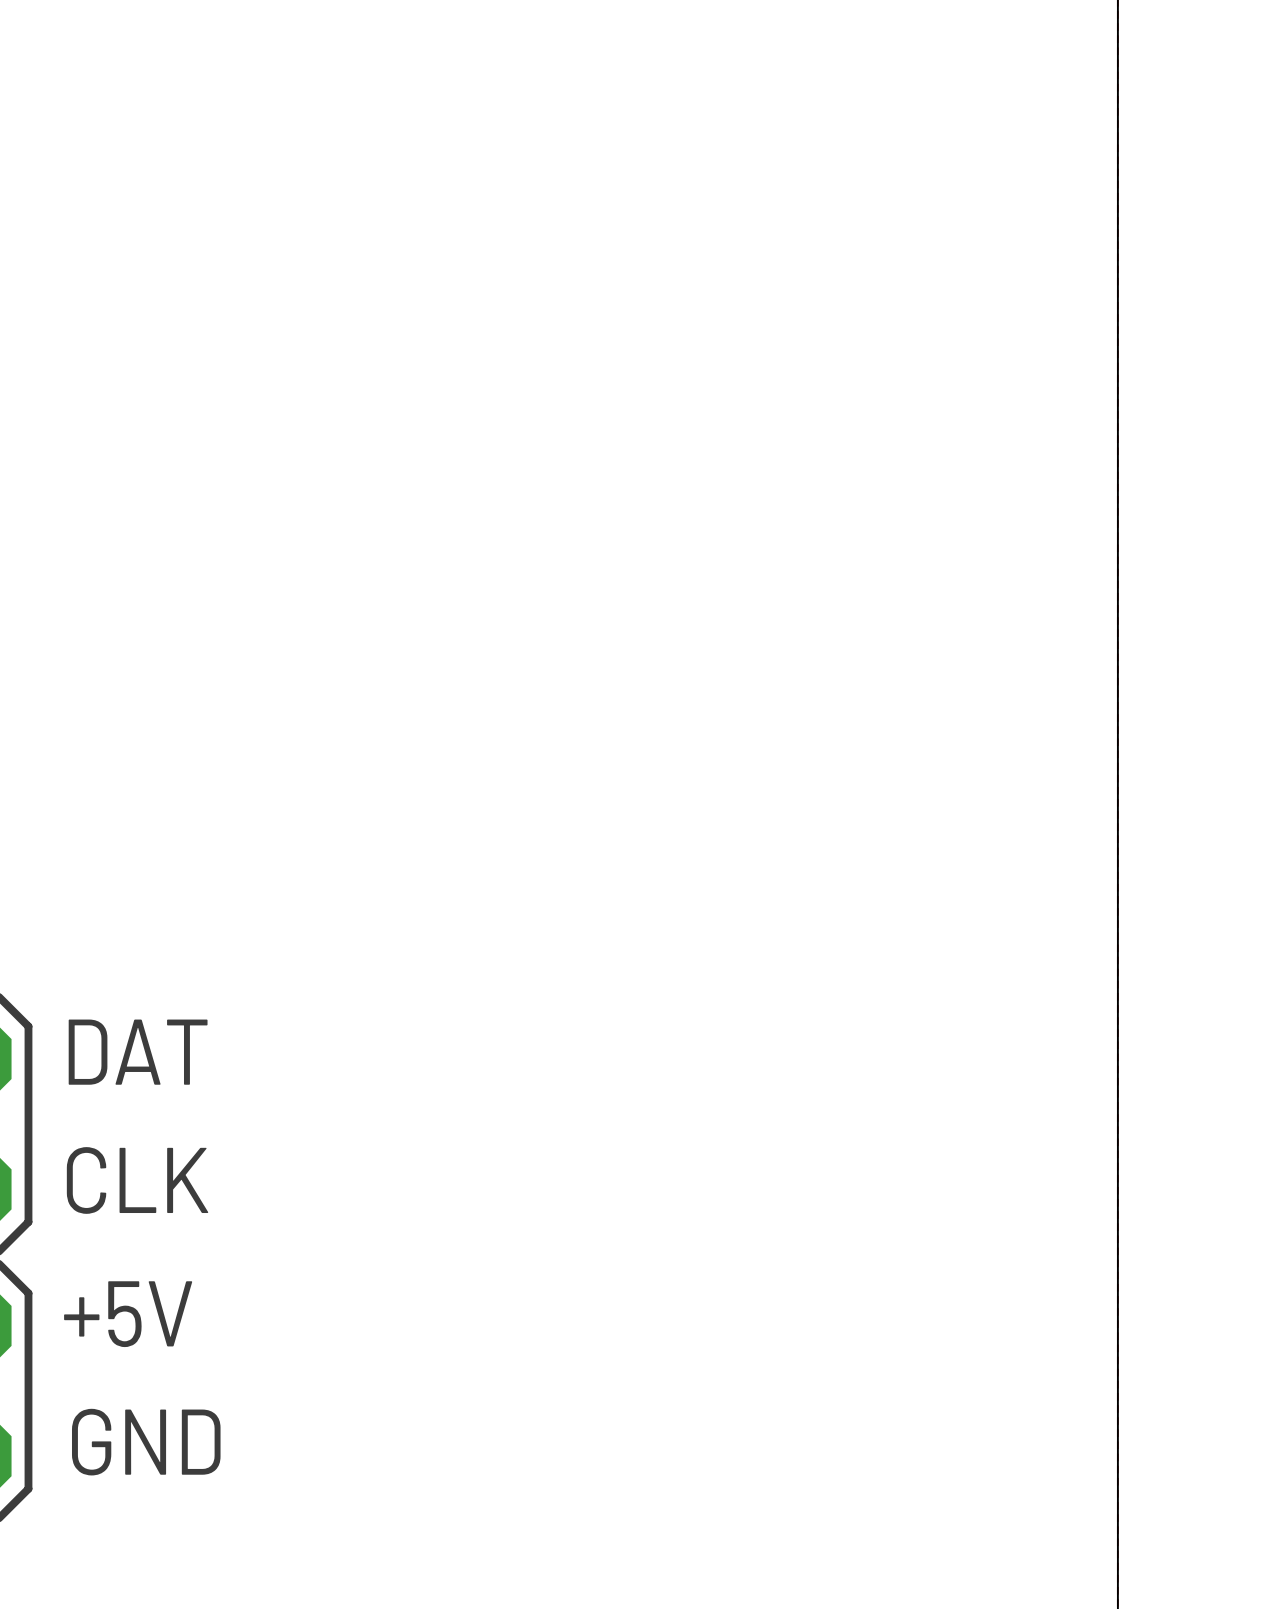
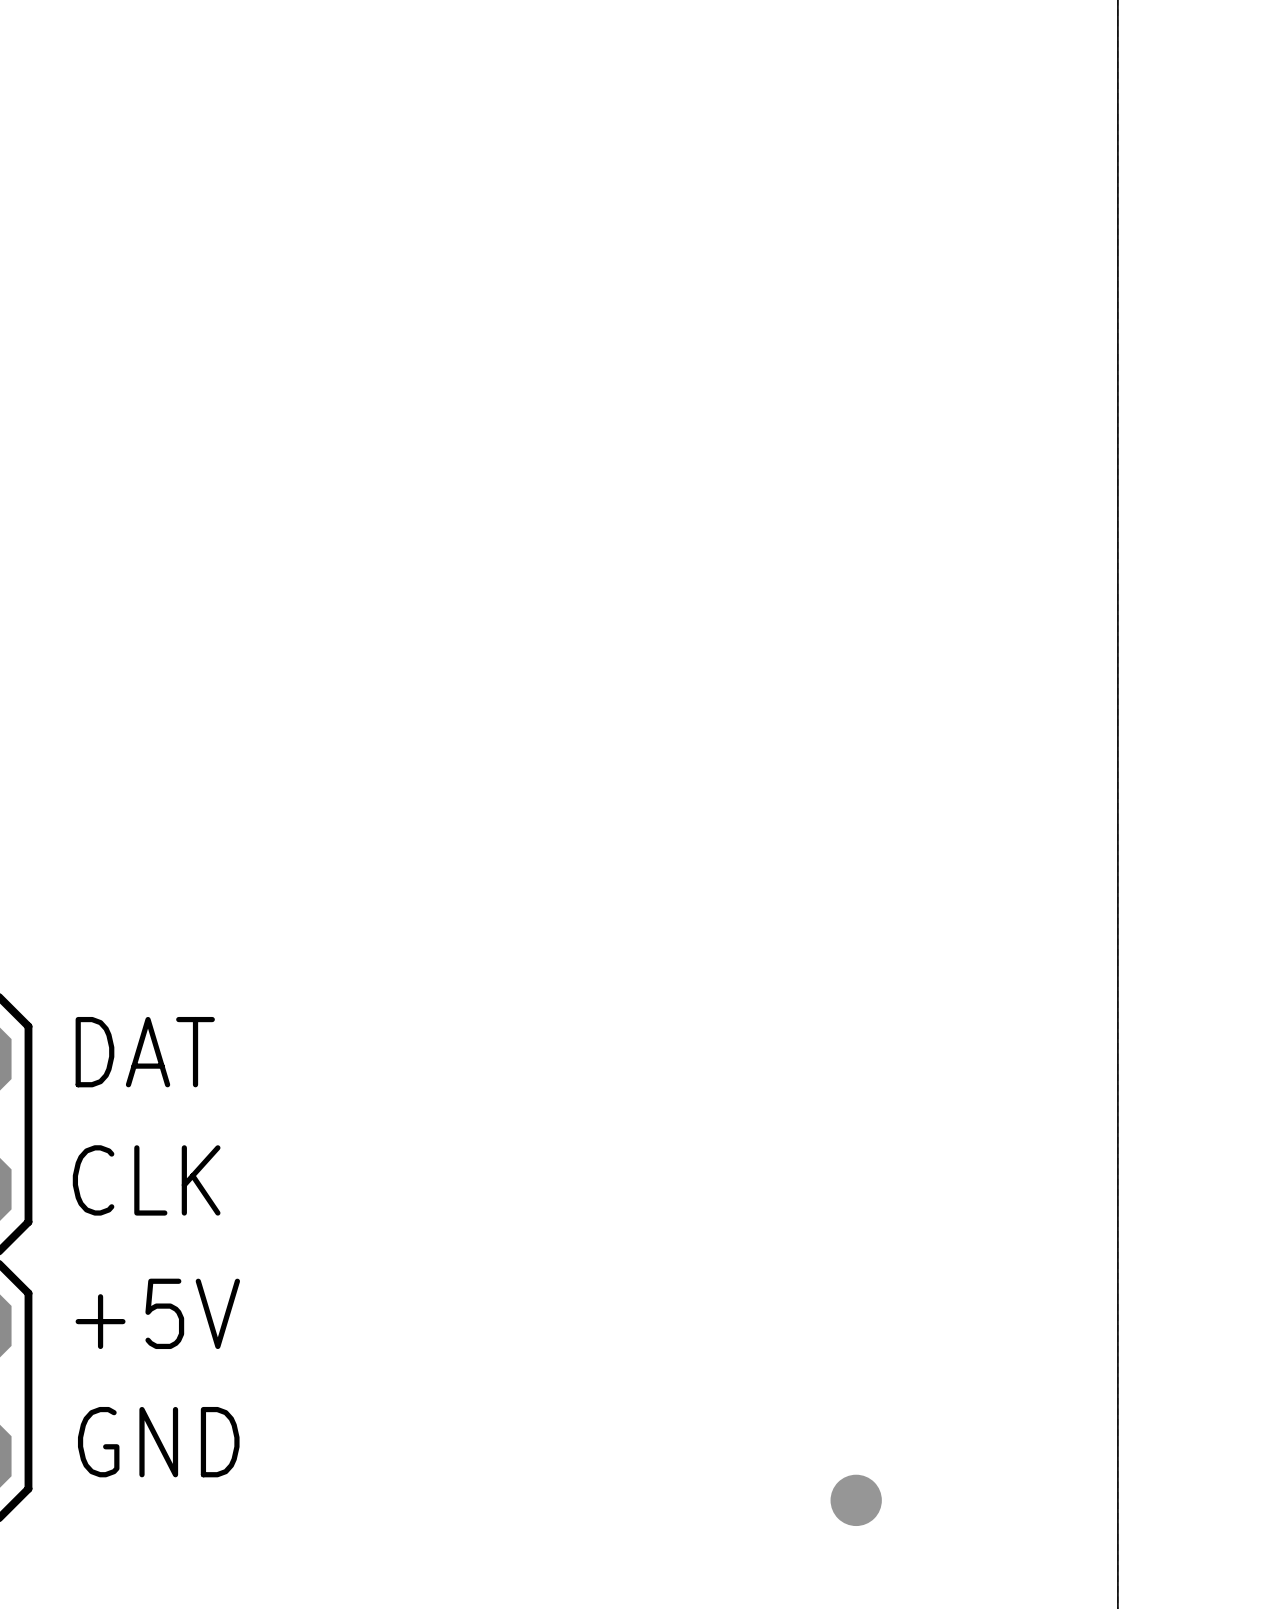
part: none -> (856, 1500)

